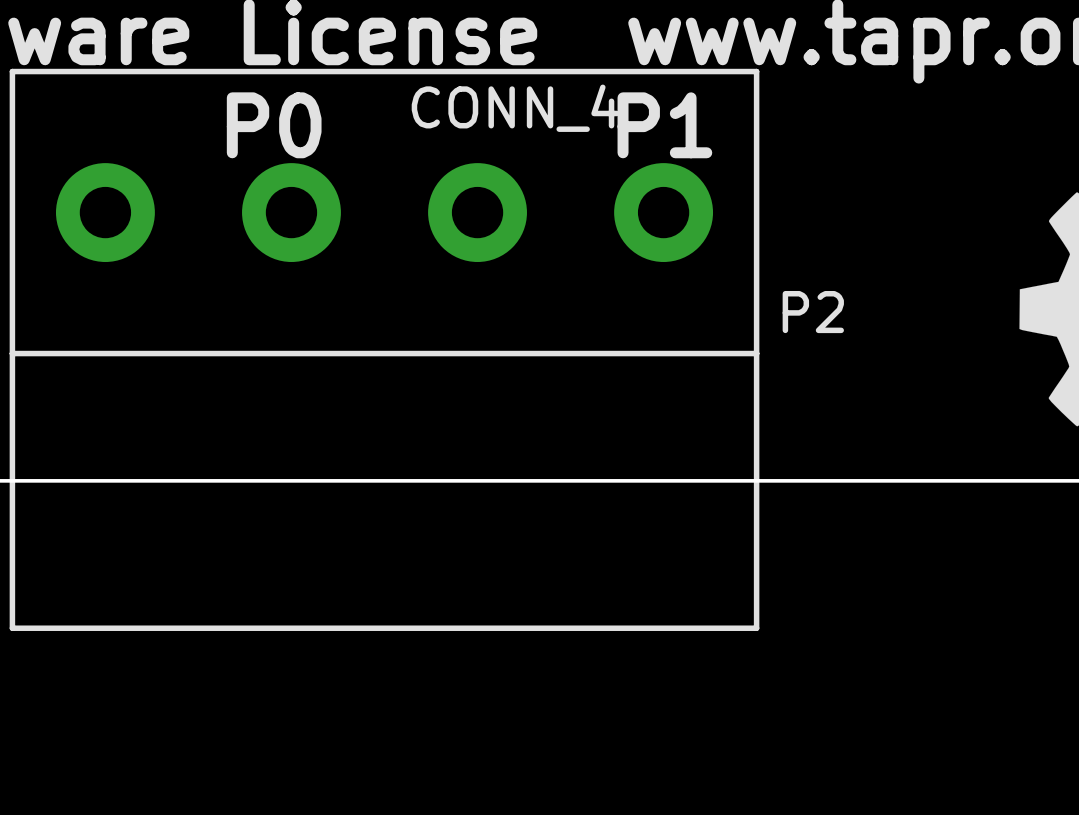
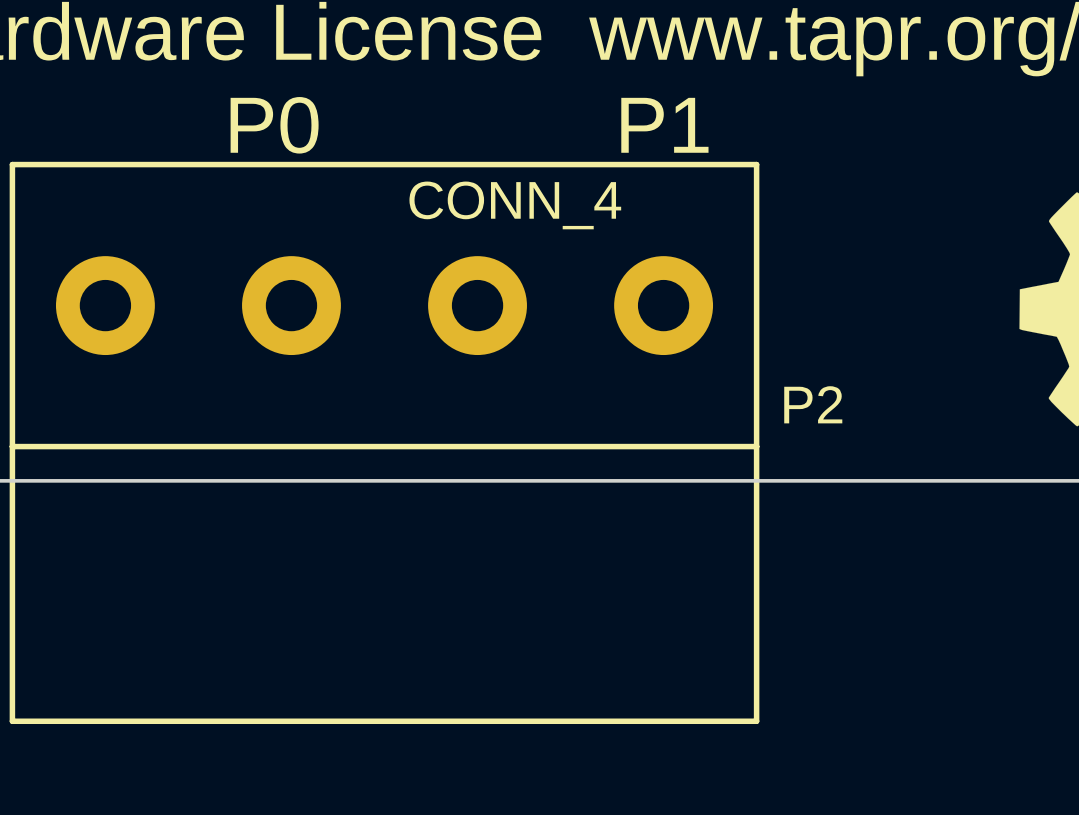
P2 position: (384, 349) -> (384, 442)

